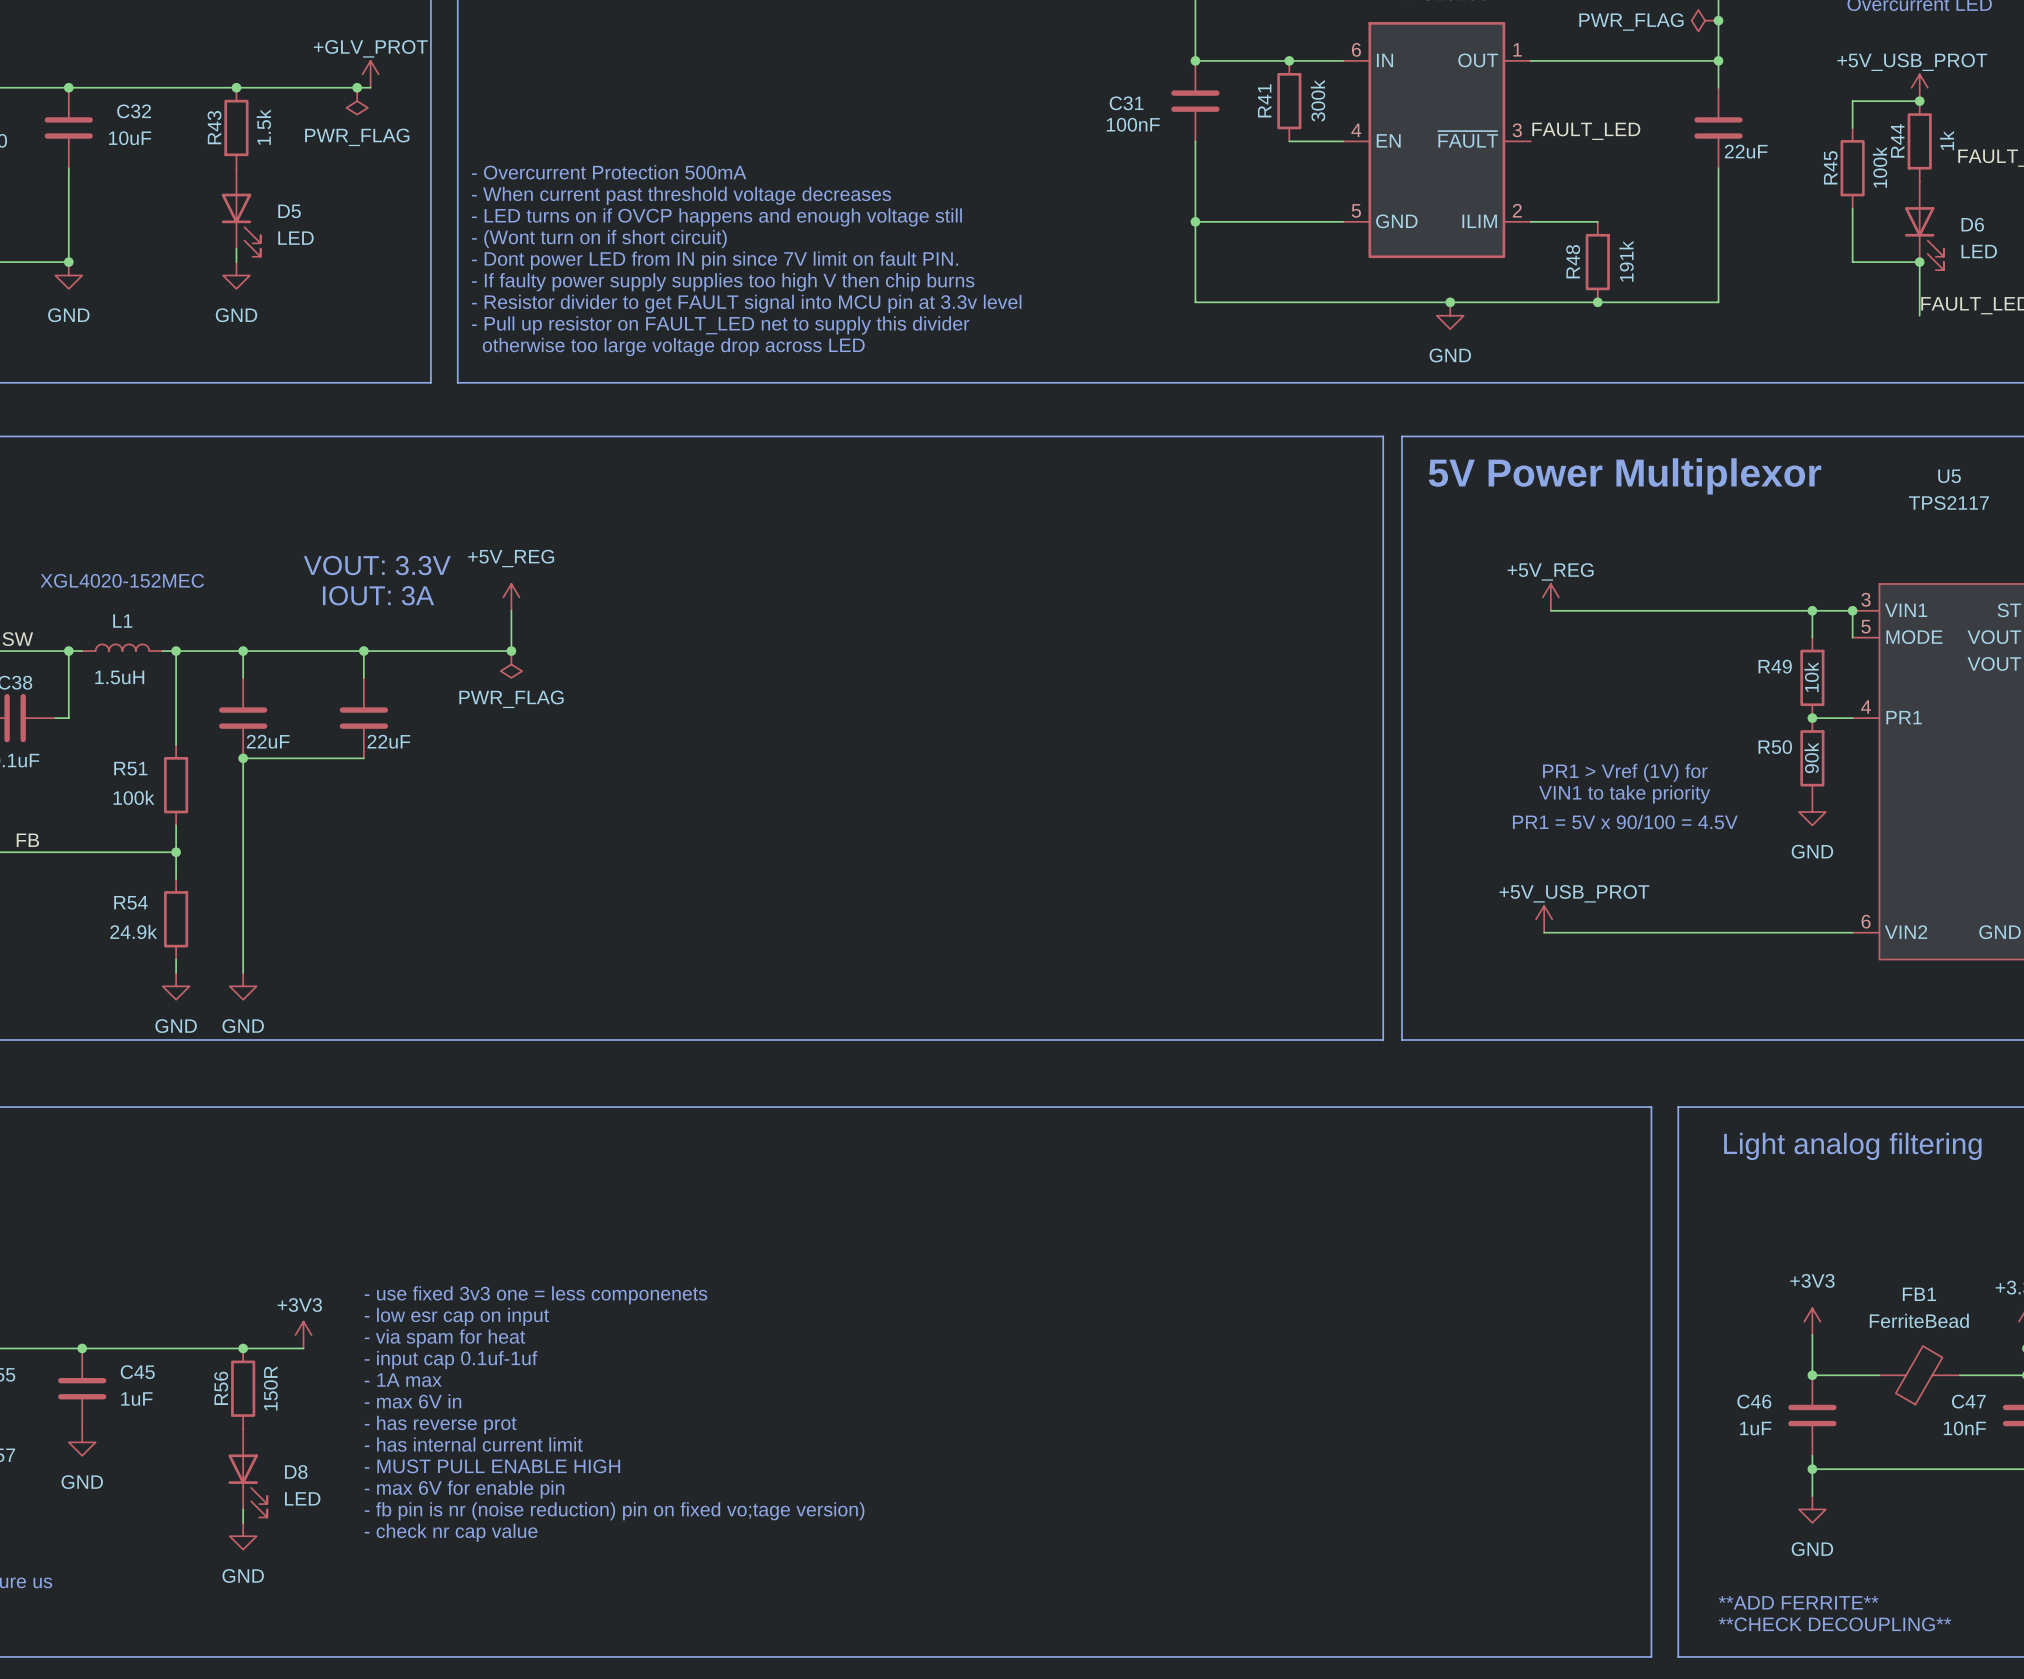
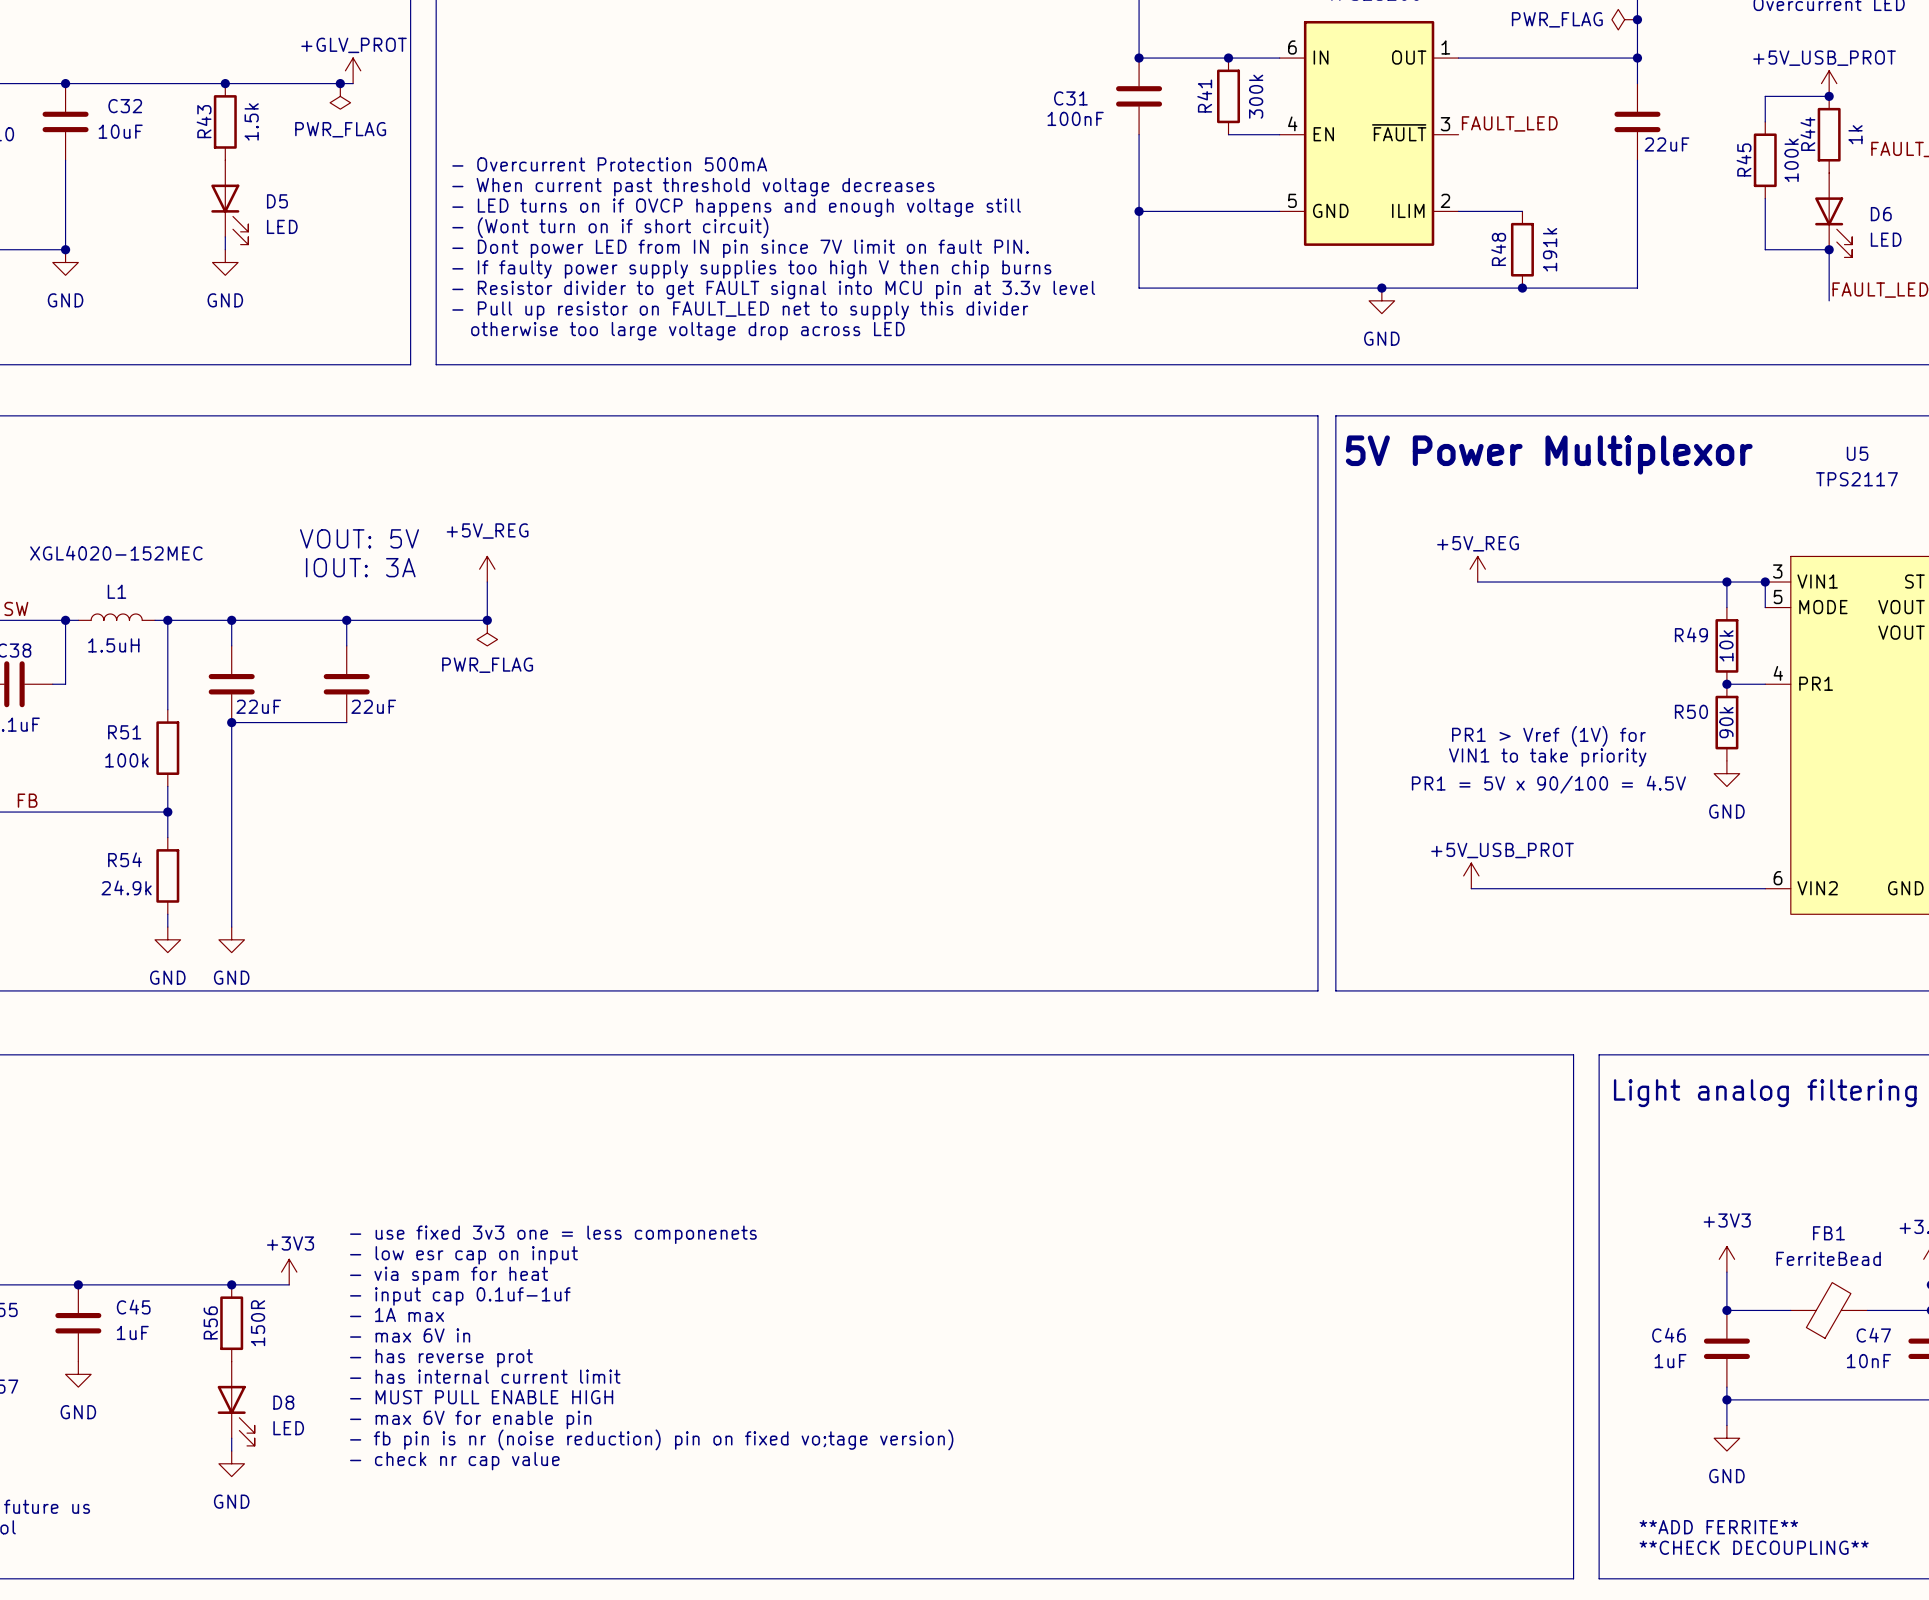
text: VOUT: 3.3V (377, 565) -> VOUT: 5V (359, 538)

